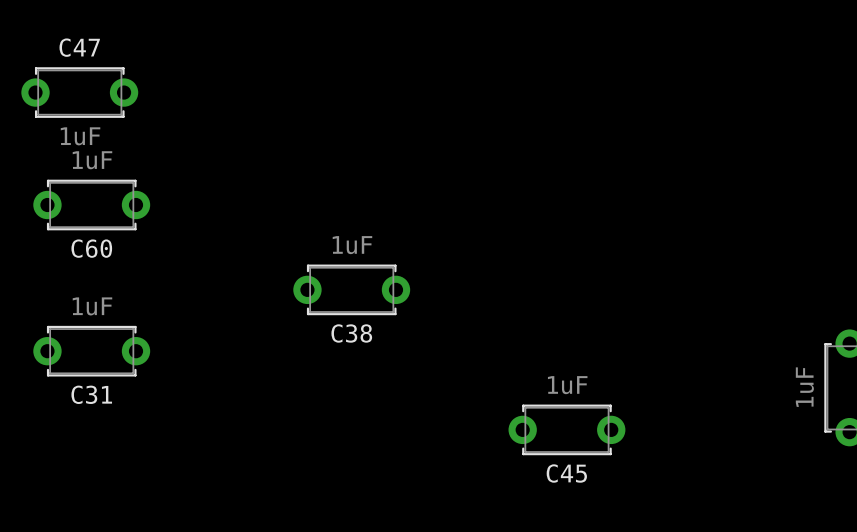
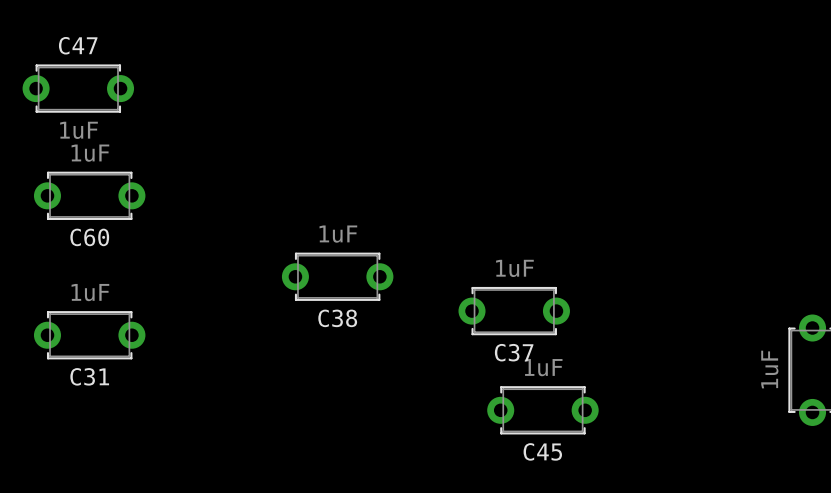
C37: none -> 1uF (514, 311)

